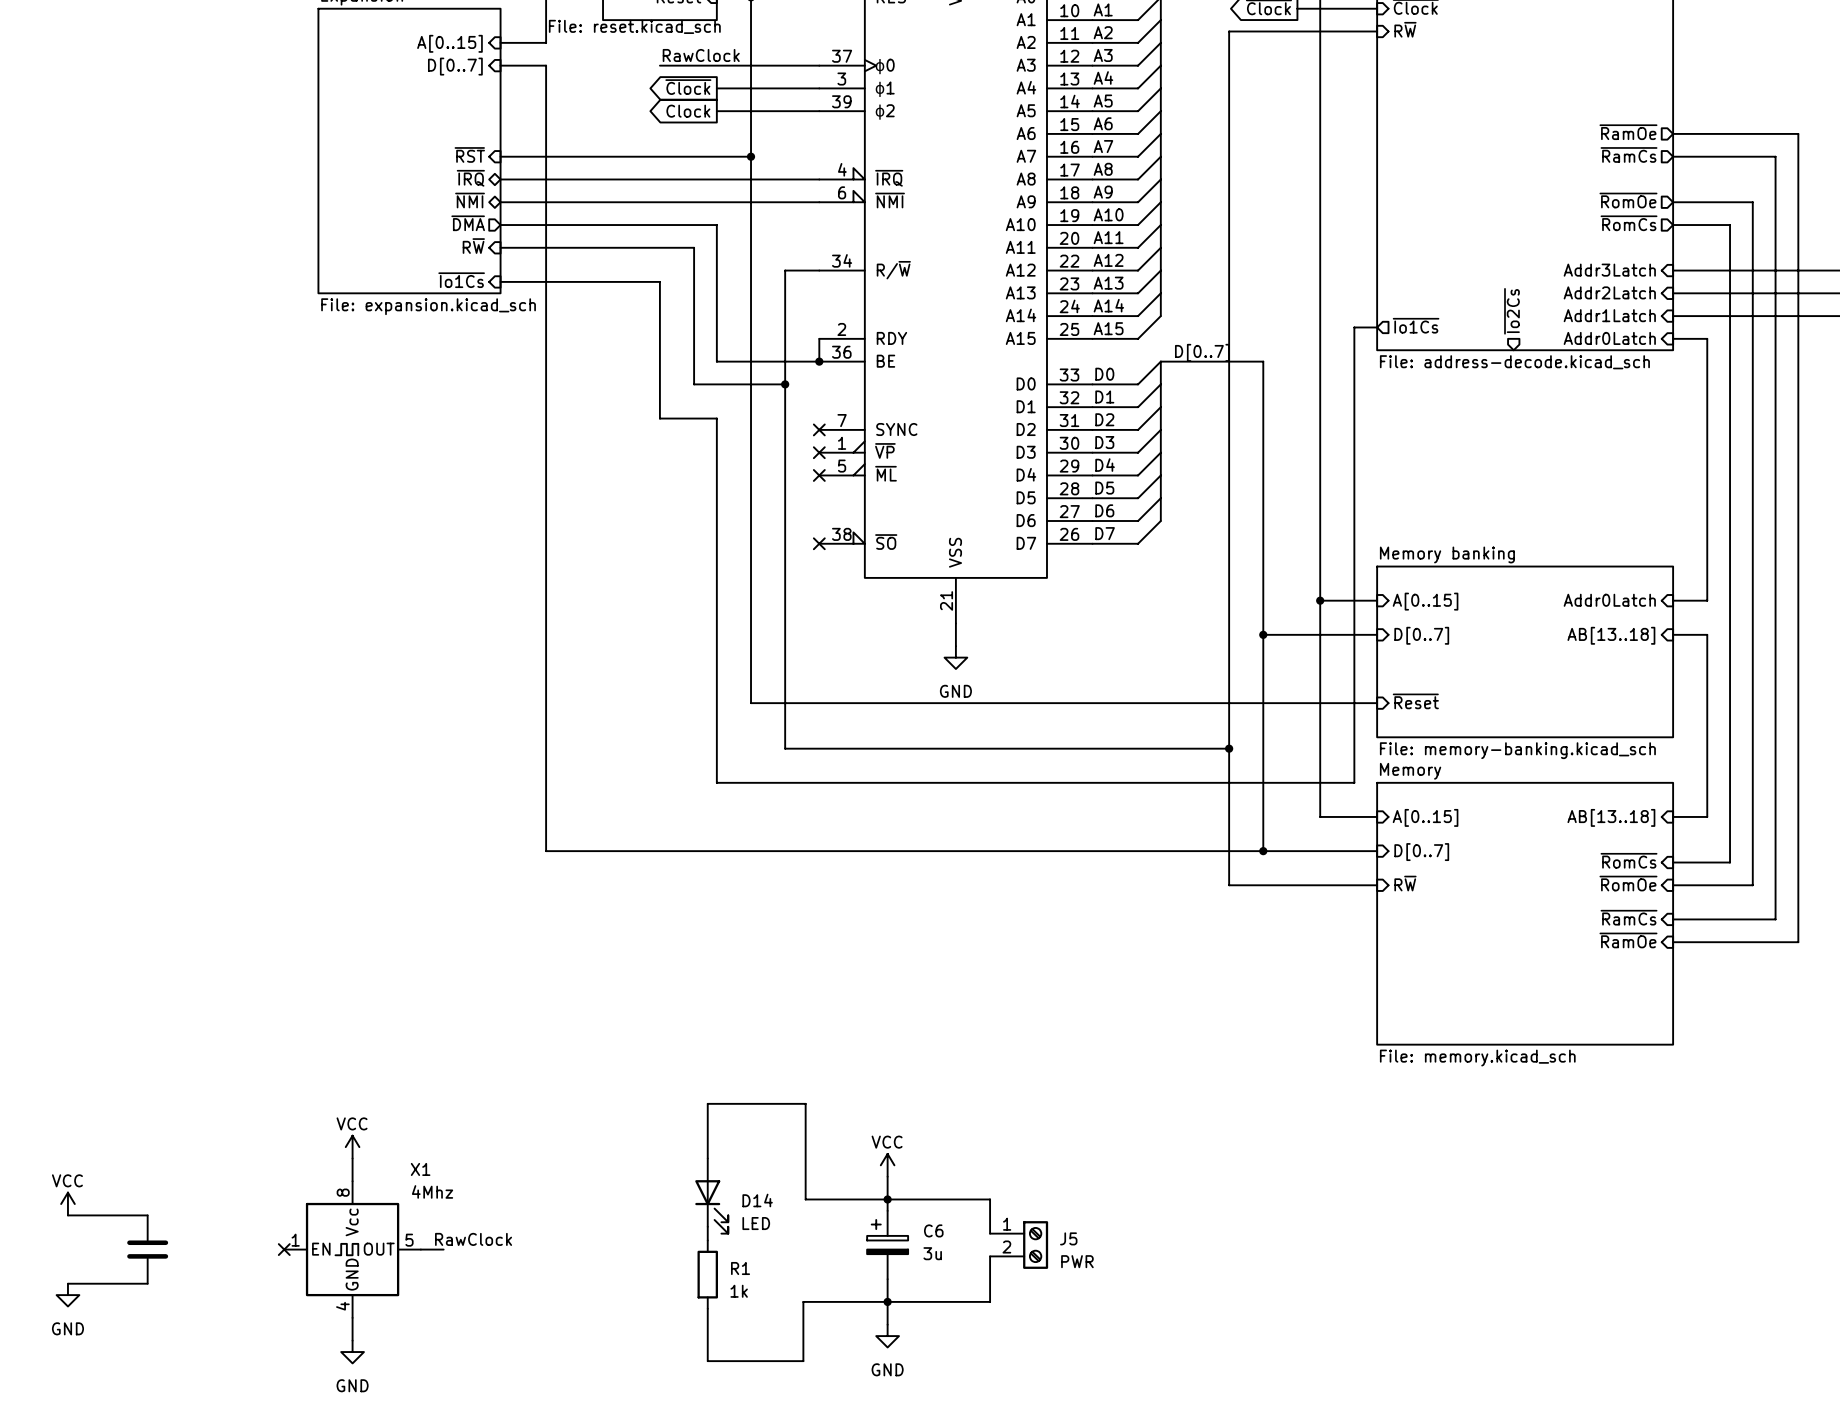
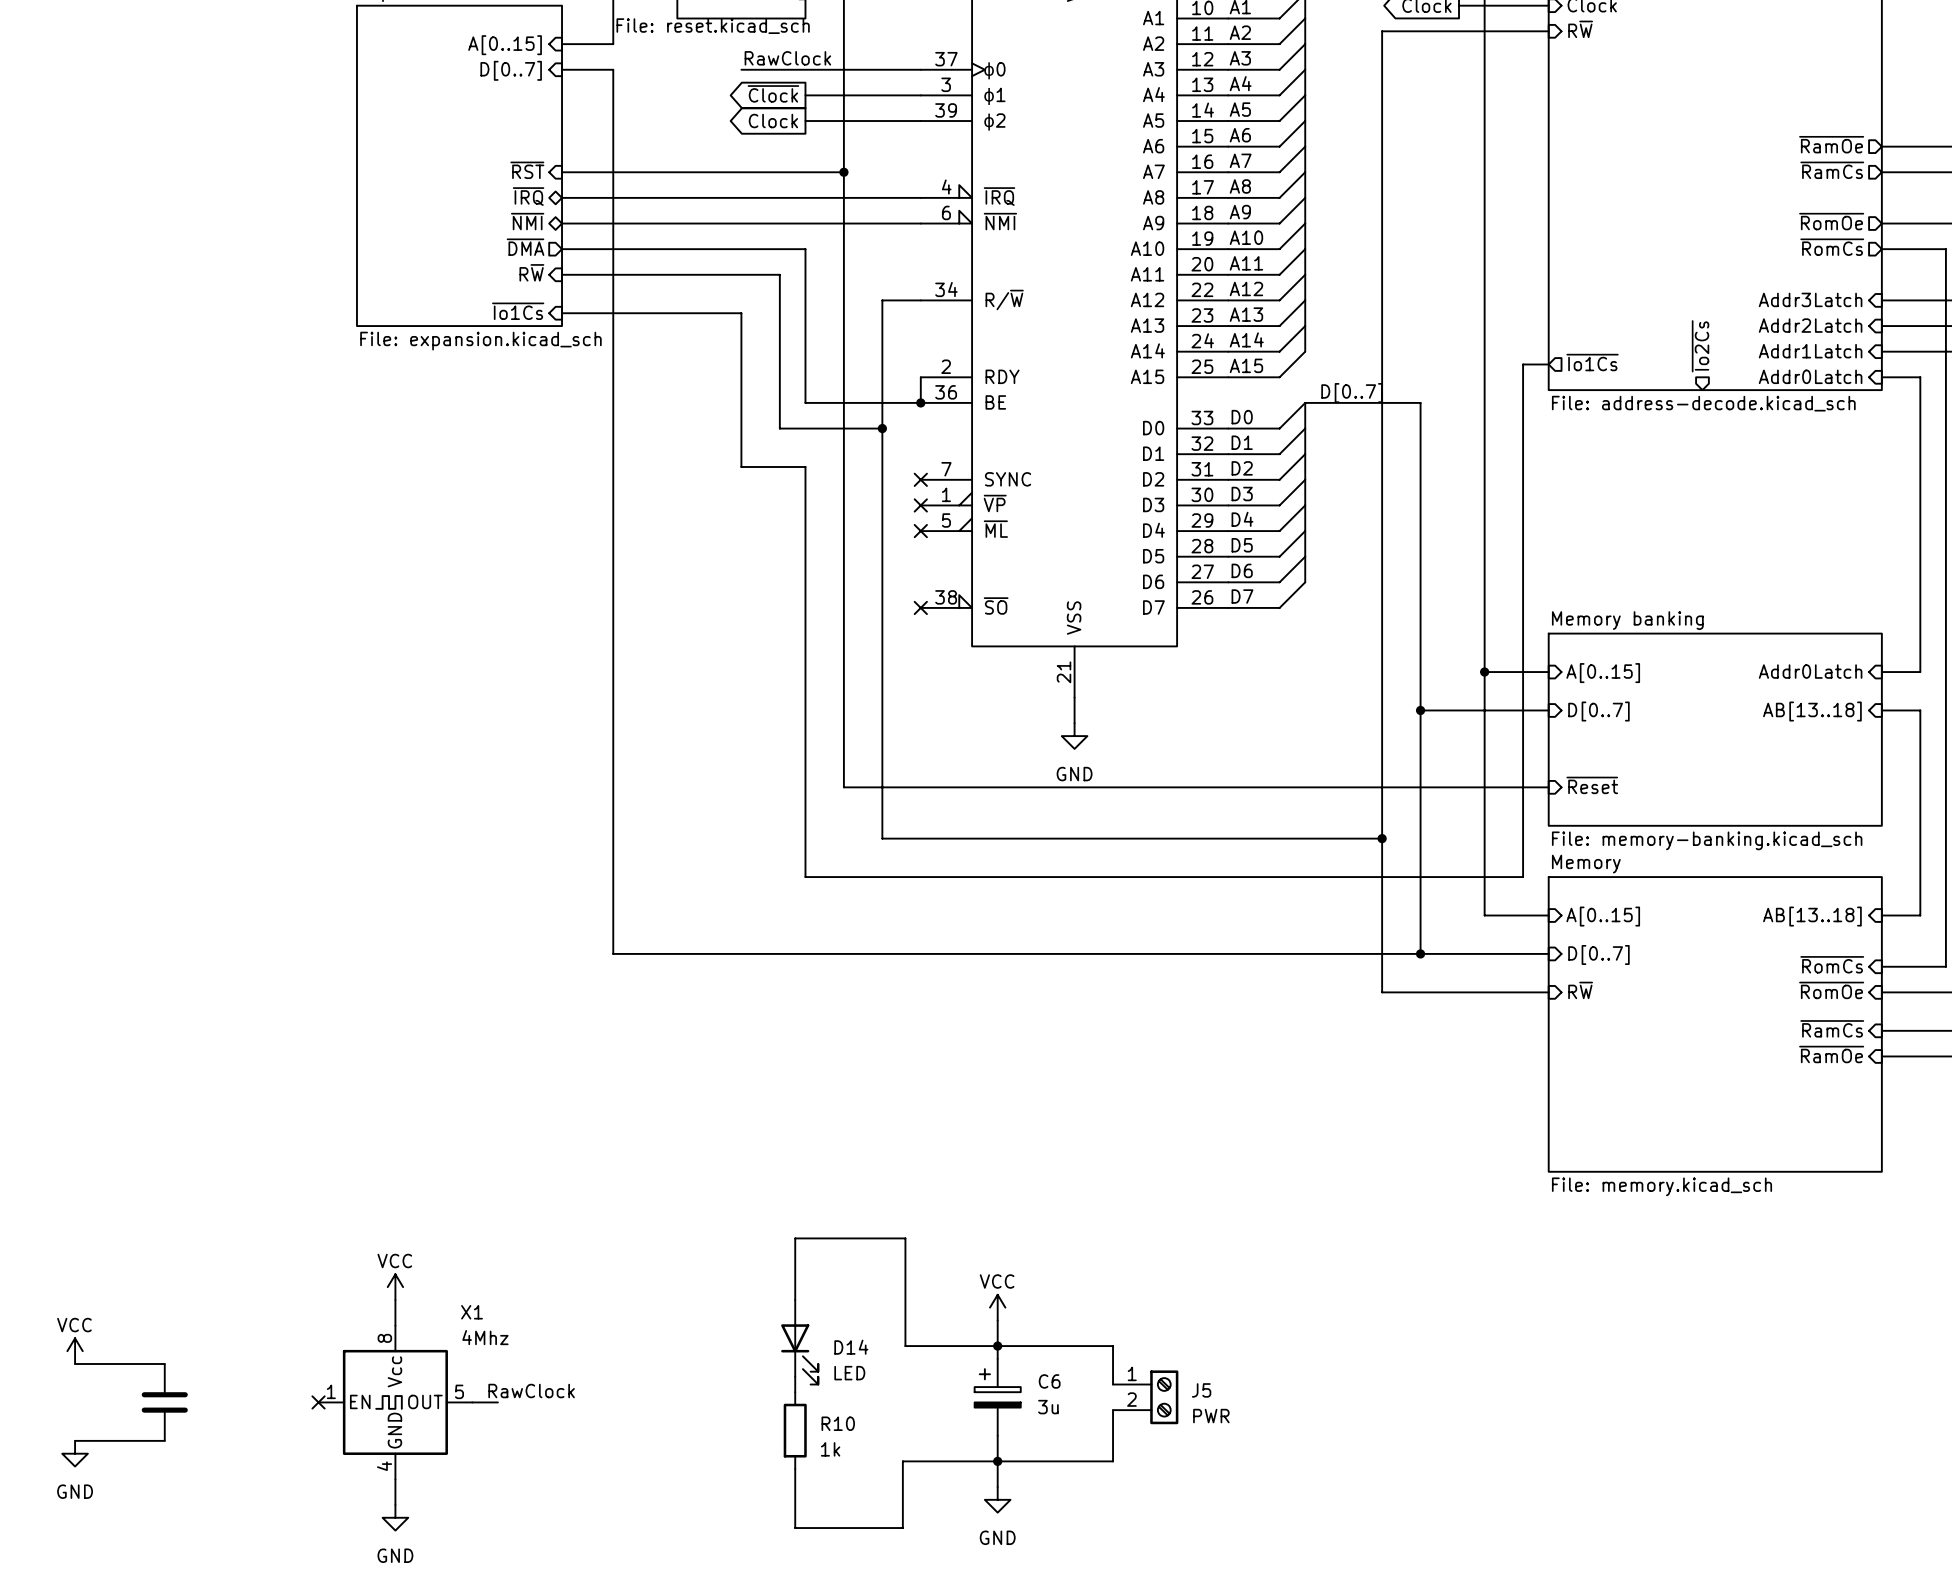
R1 name: R1 (740, 1268) -> R10 (838, 1423)

